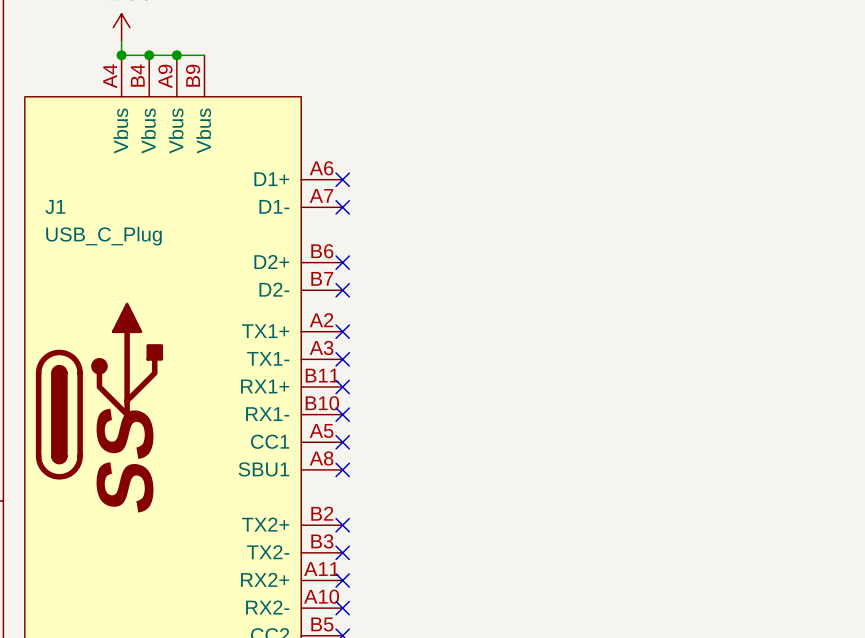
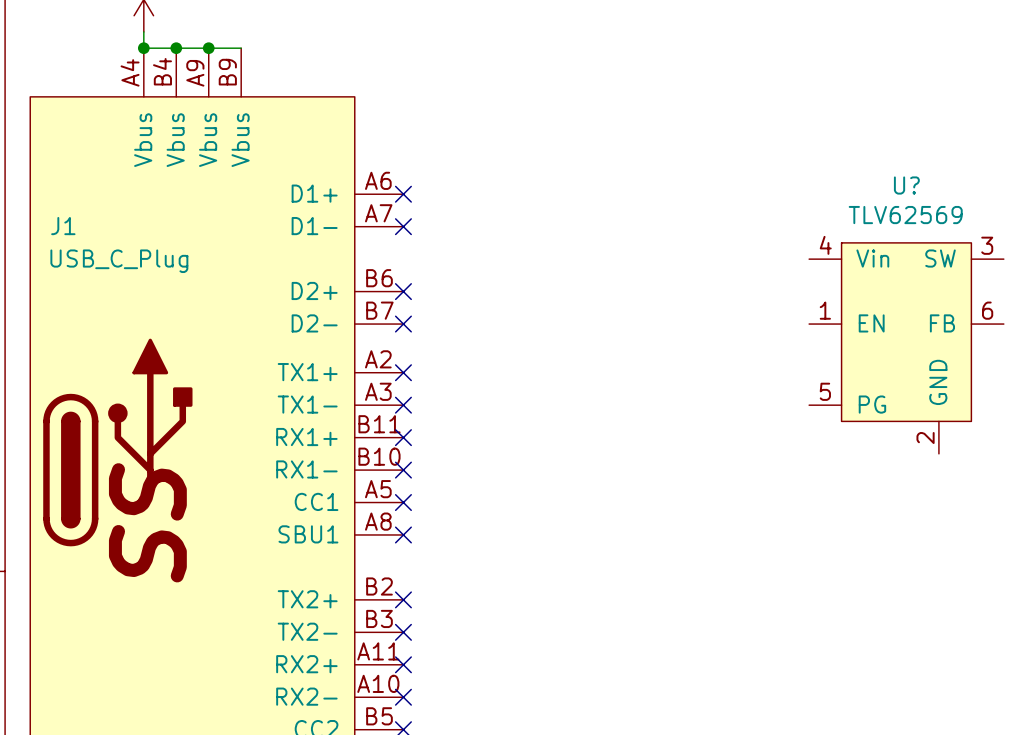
U?: none -> TLV62569 (906, 348)

